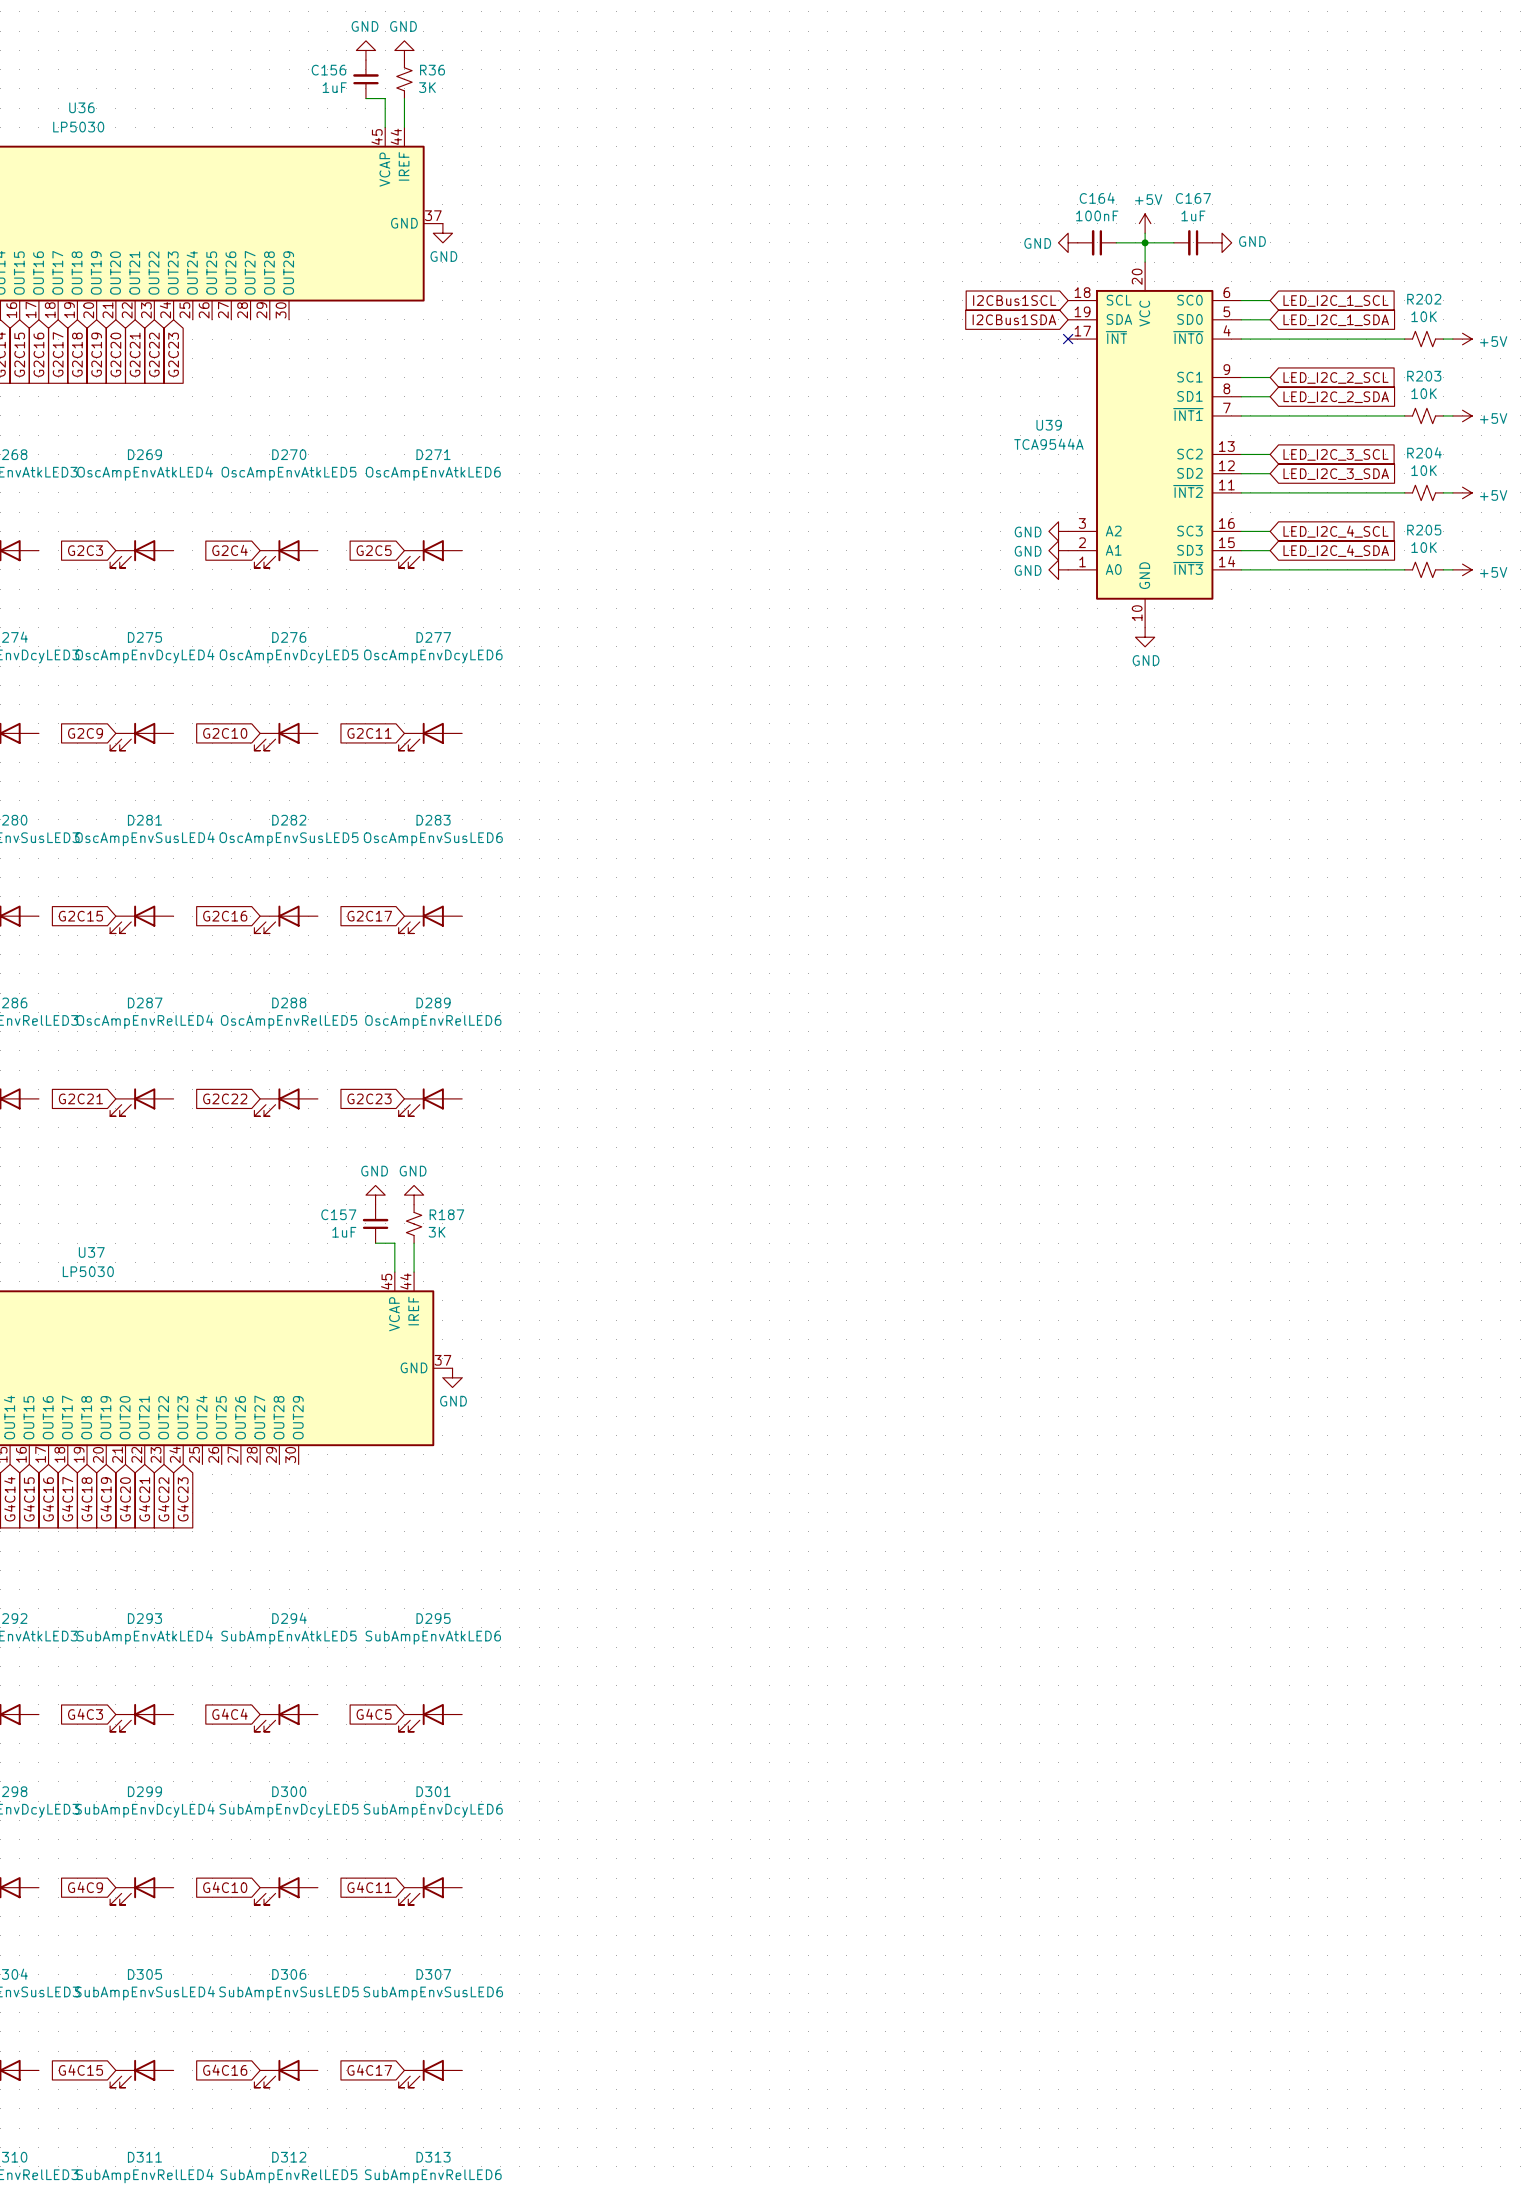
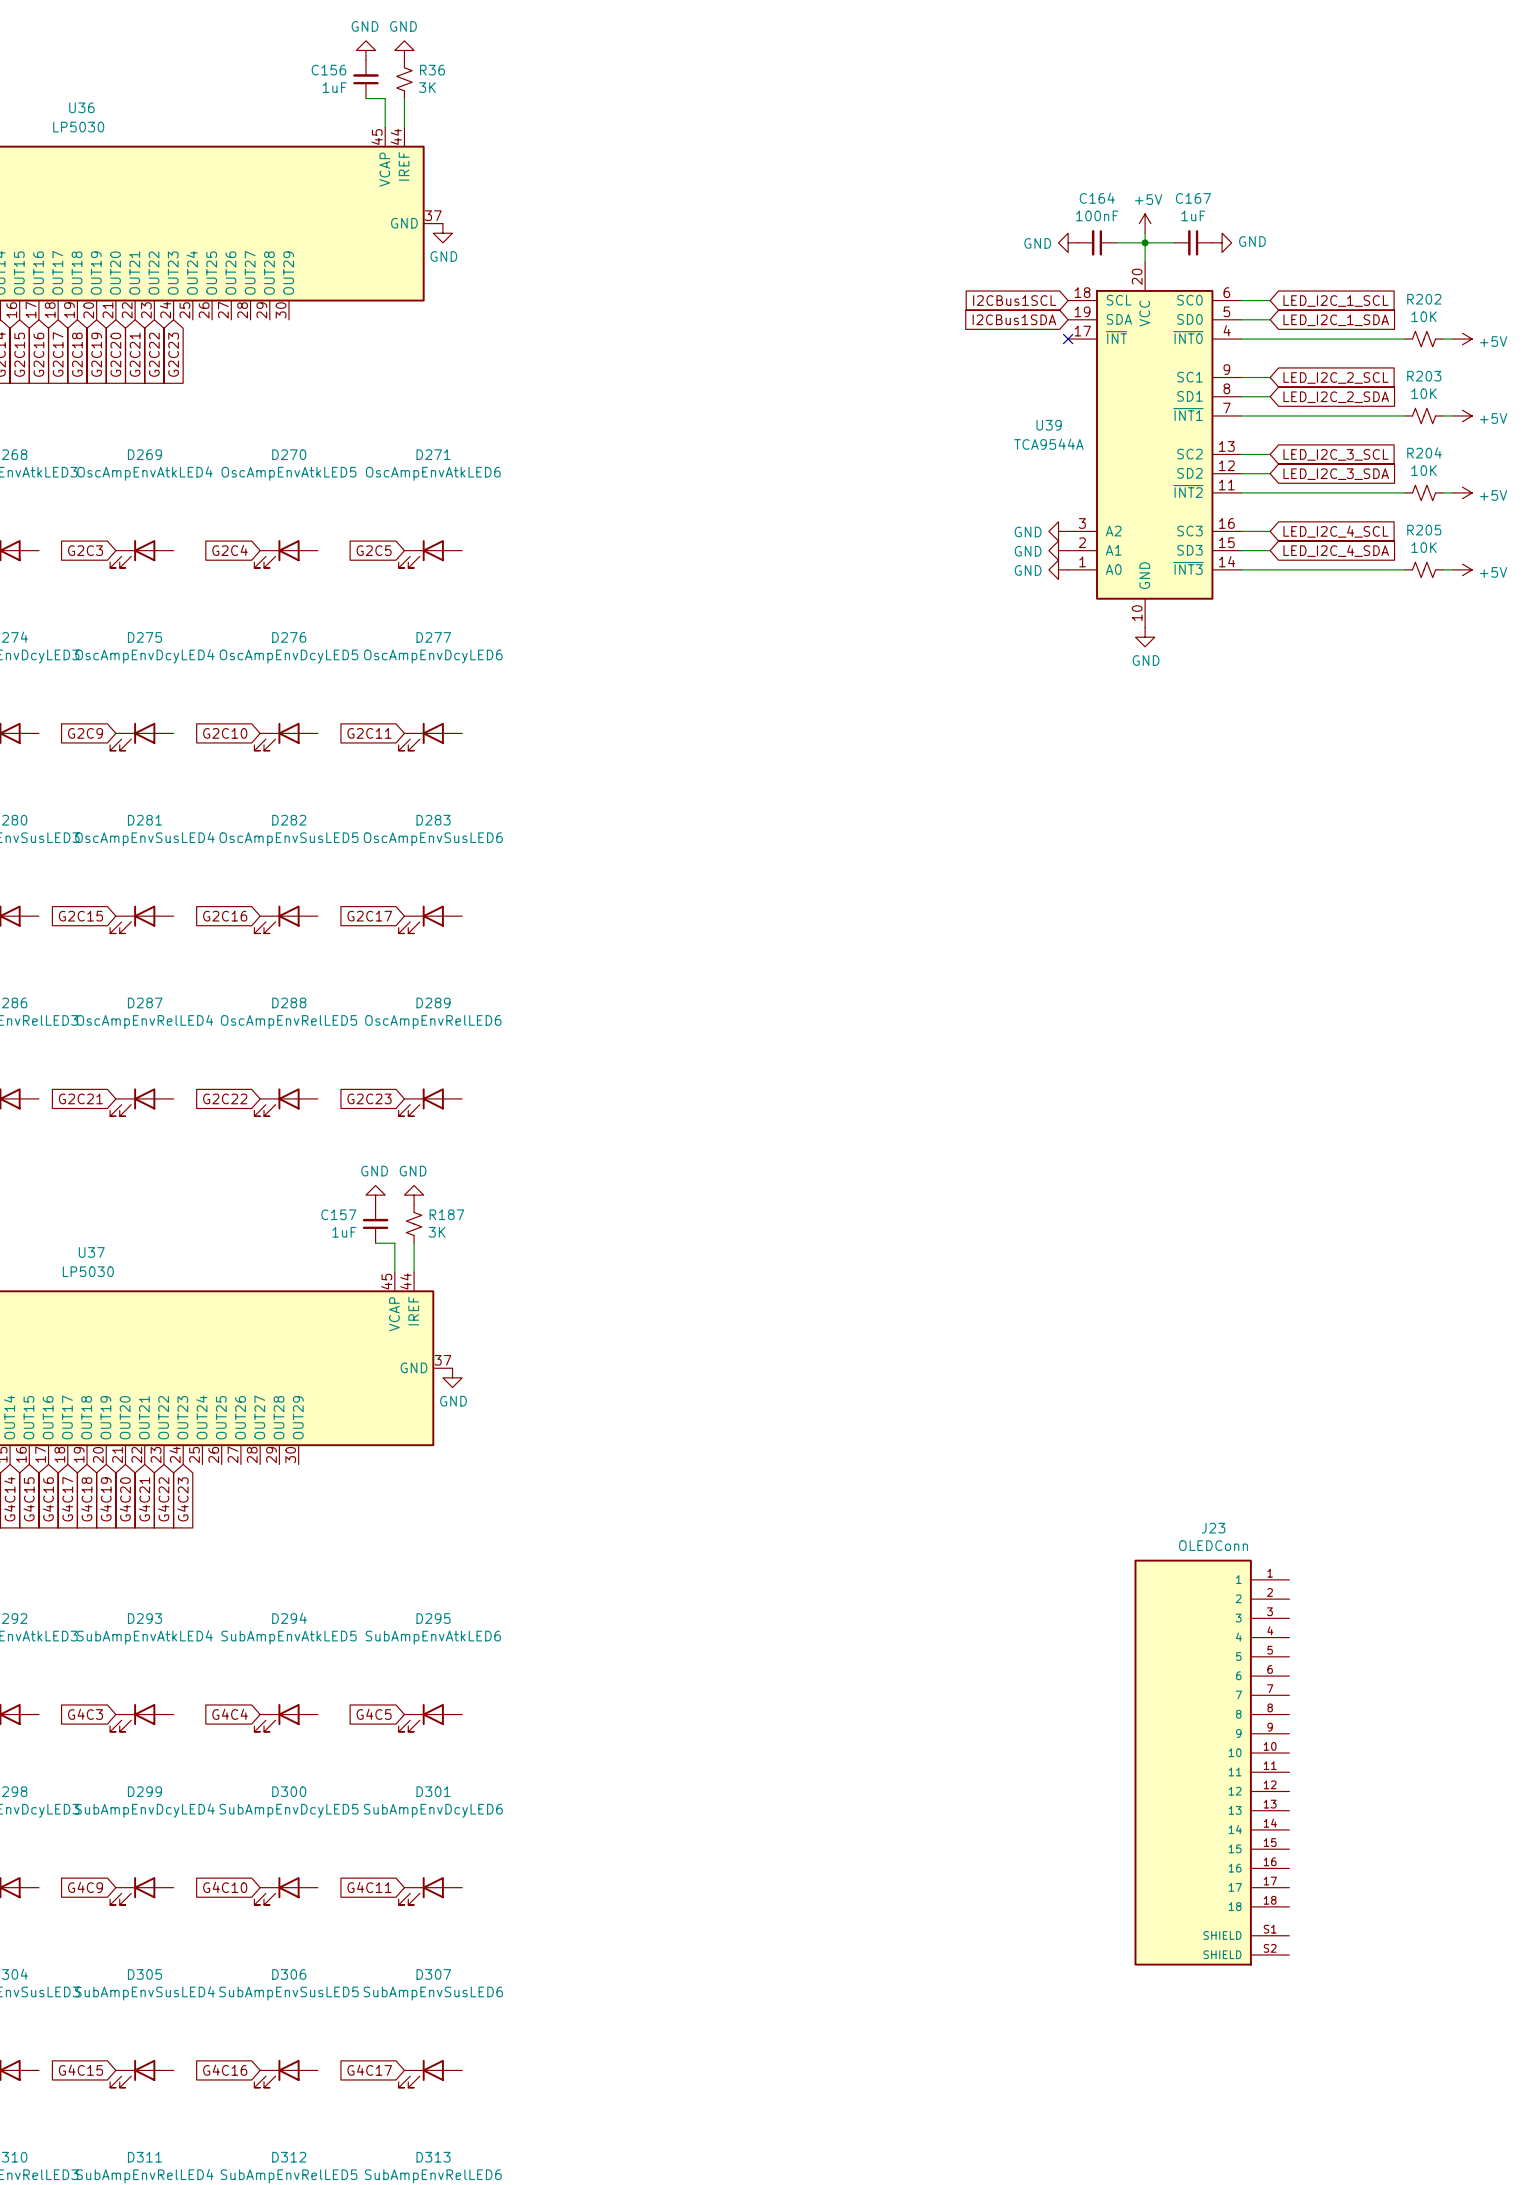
J23: none -> OLEDConn (1211, 1762)

